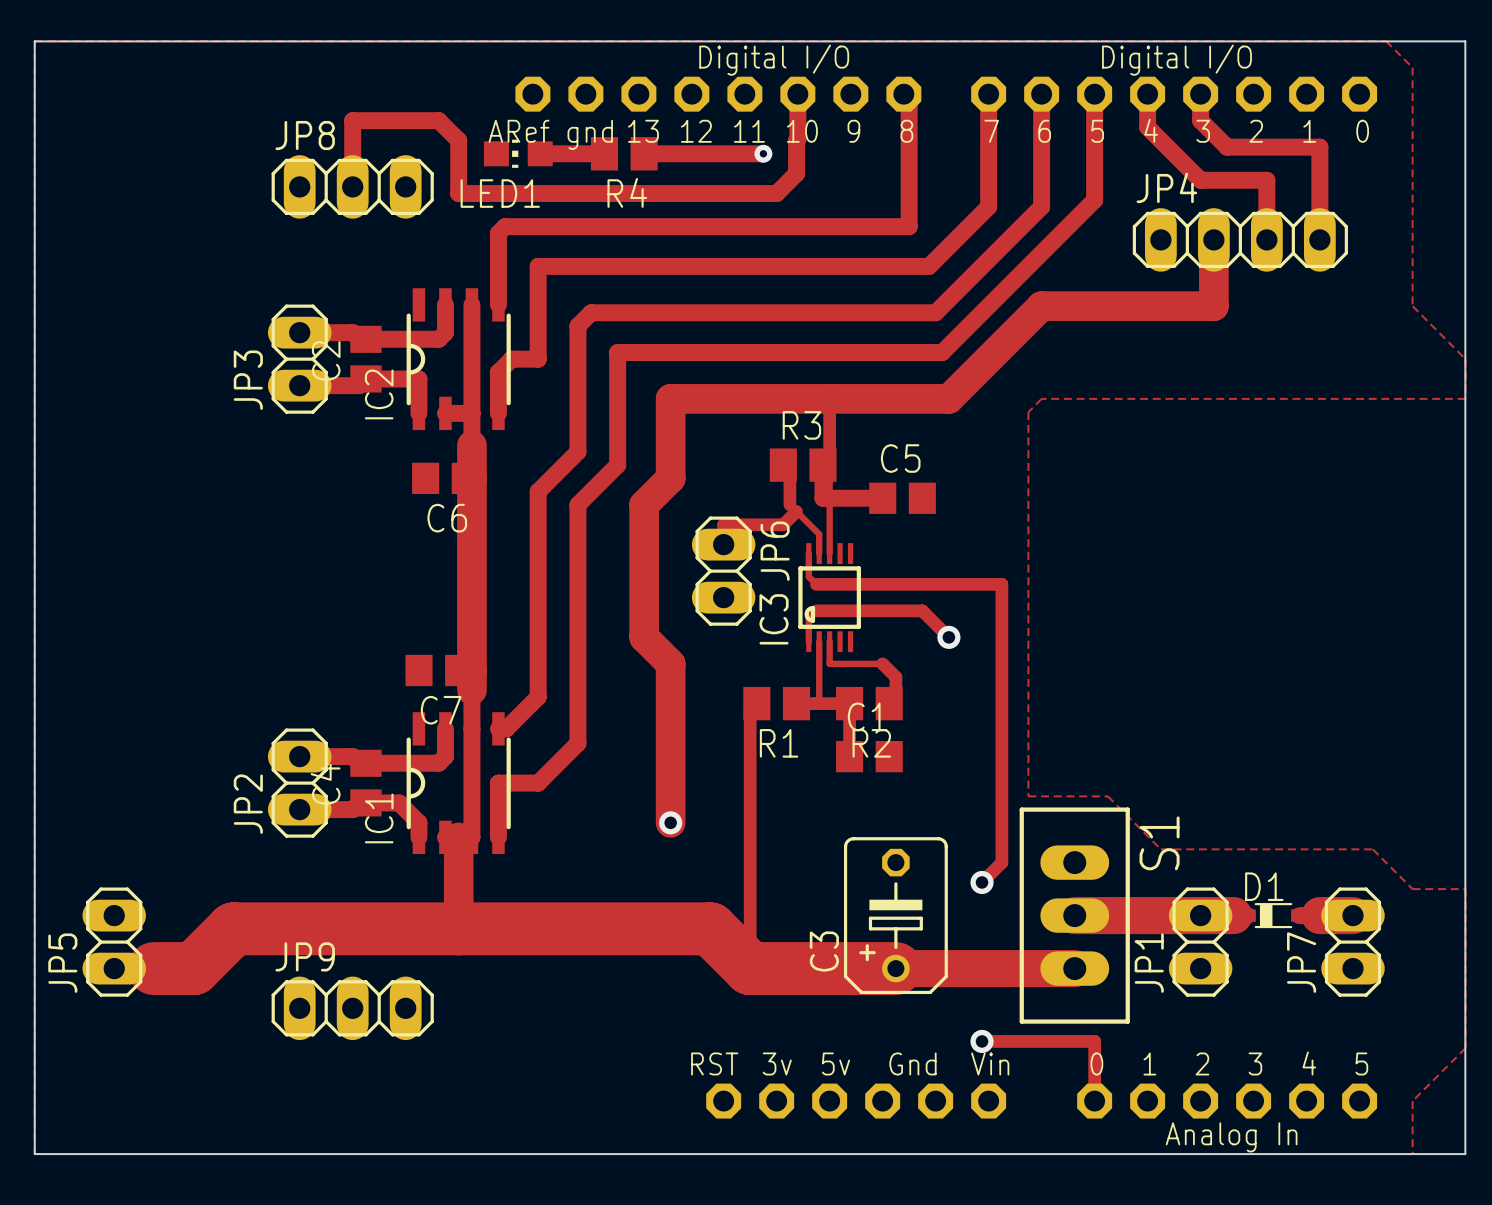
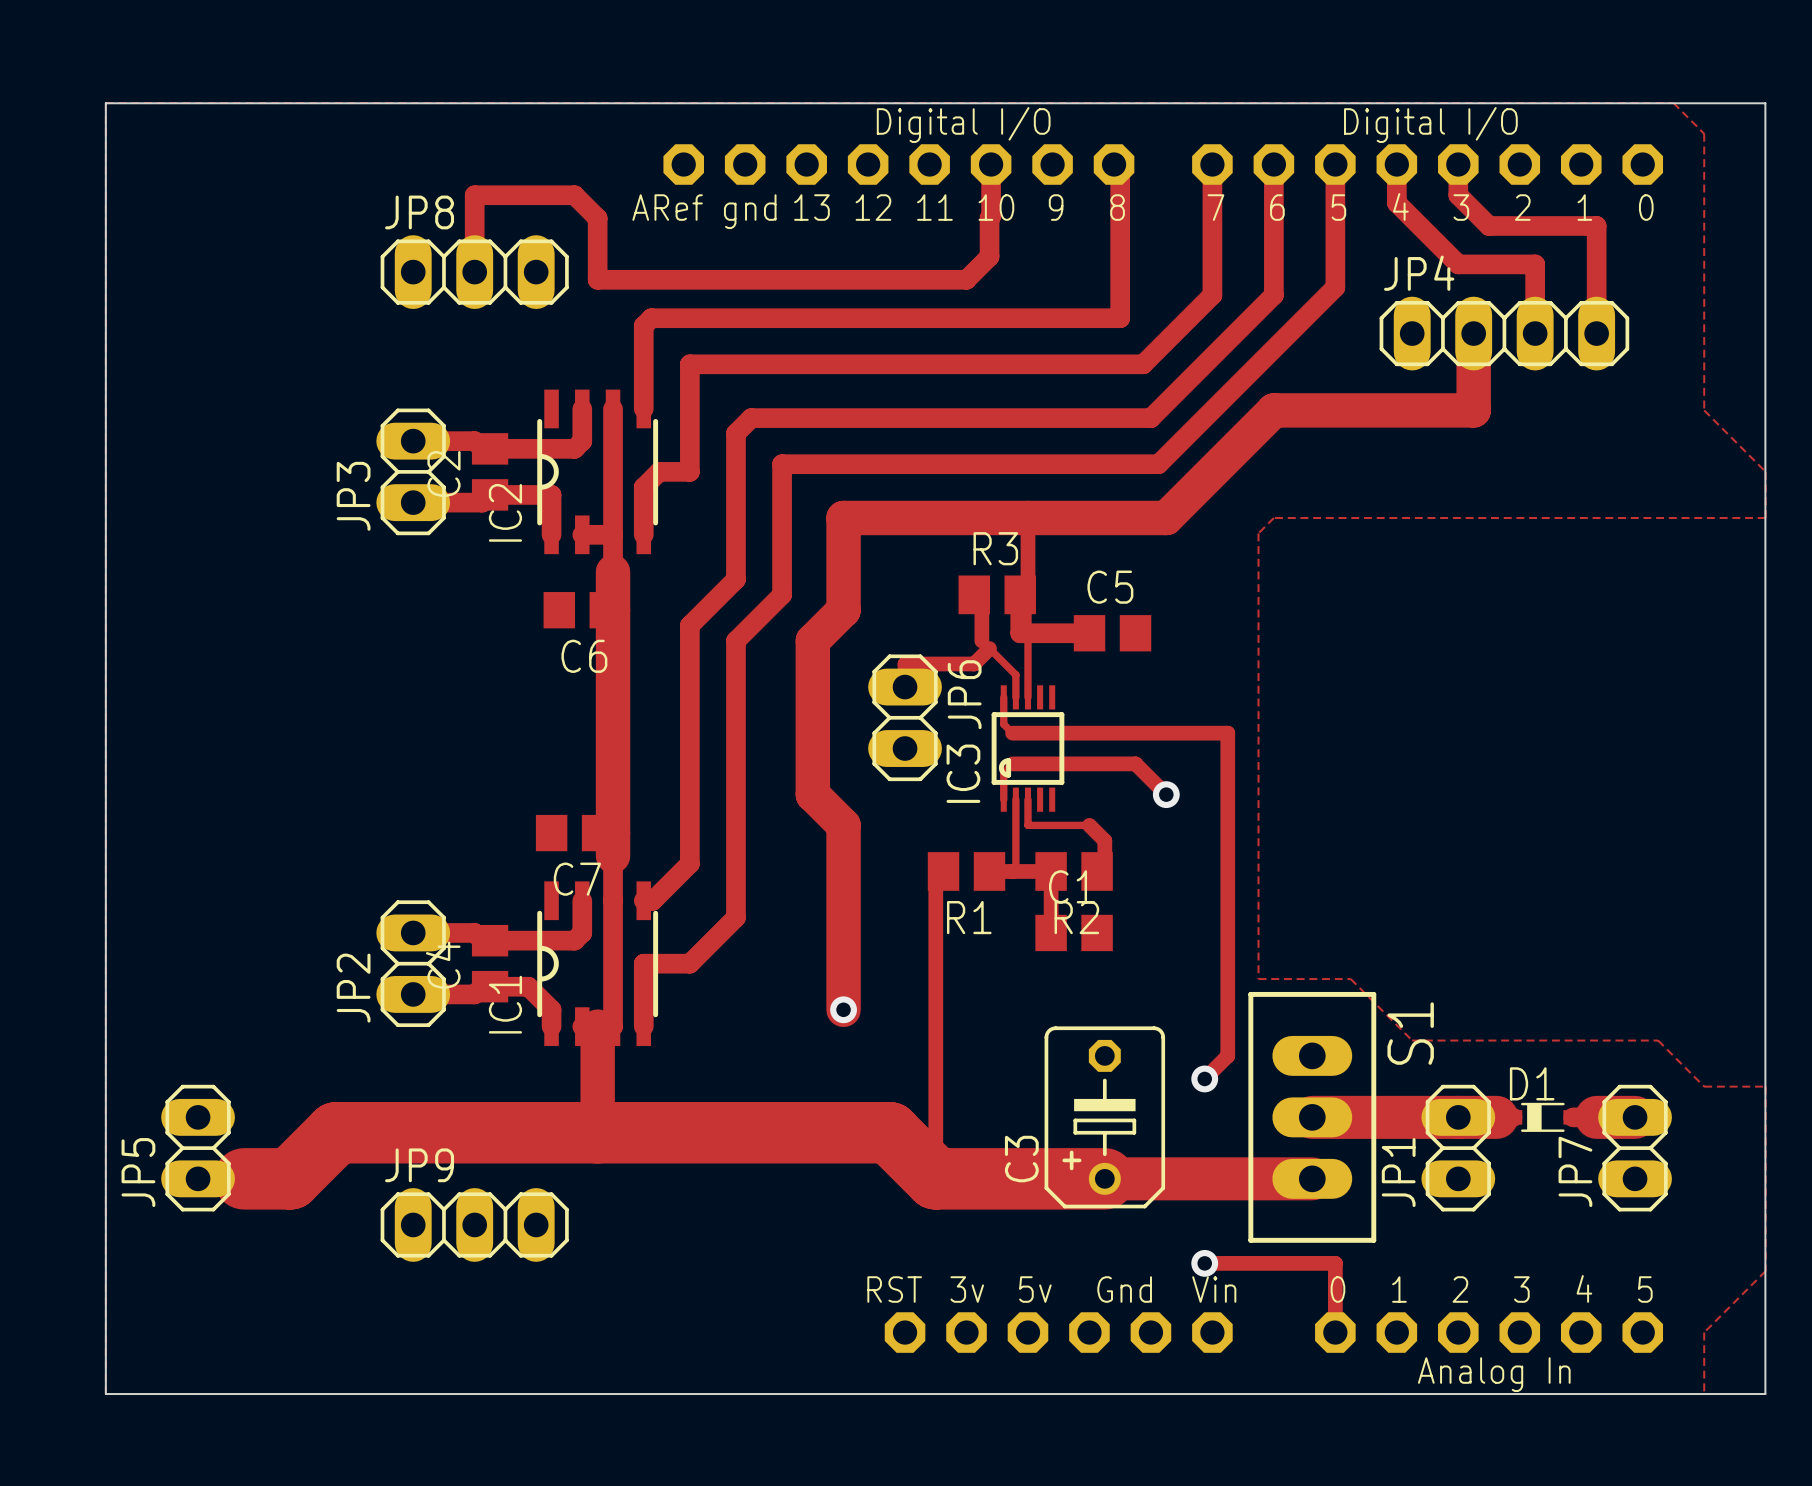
LED1: (518, 153) -> none
track: (540, 153) (604, 153) -> none
R4: (624, 153) -> none
track: (644, 153) (763, 153) -> none
via: (763, 153) -> none

